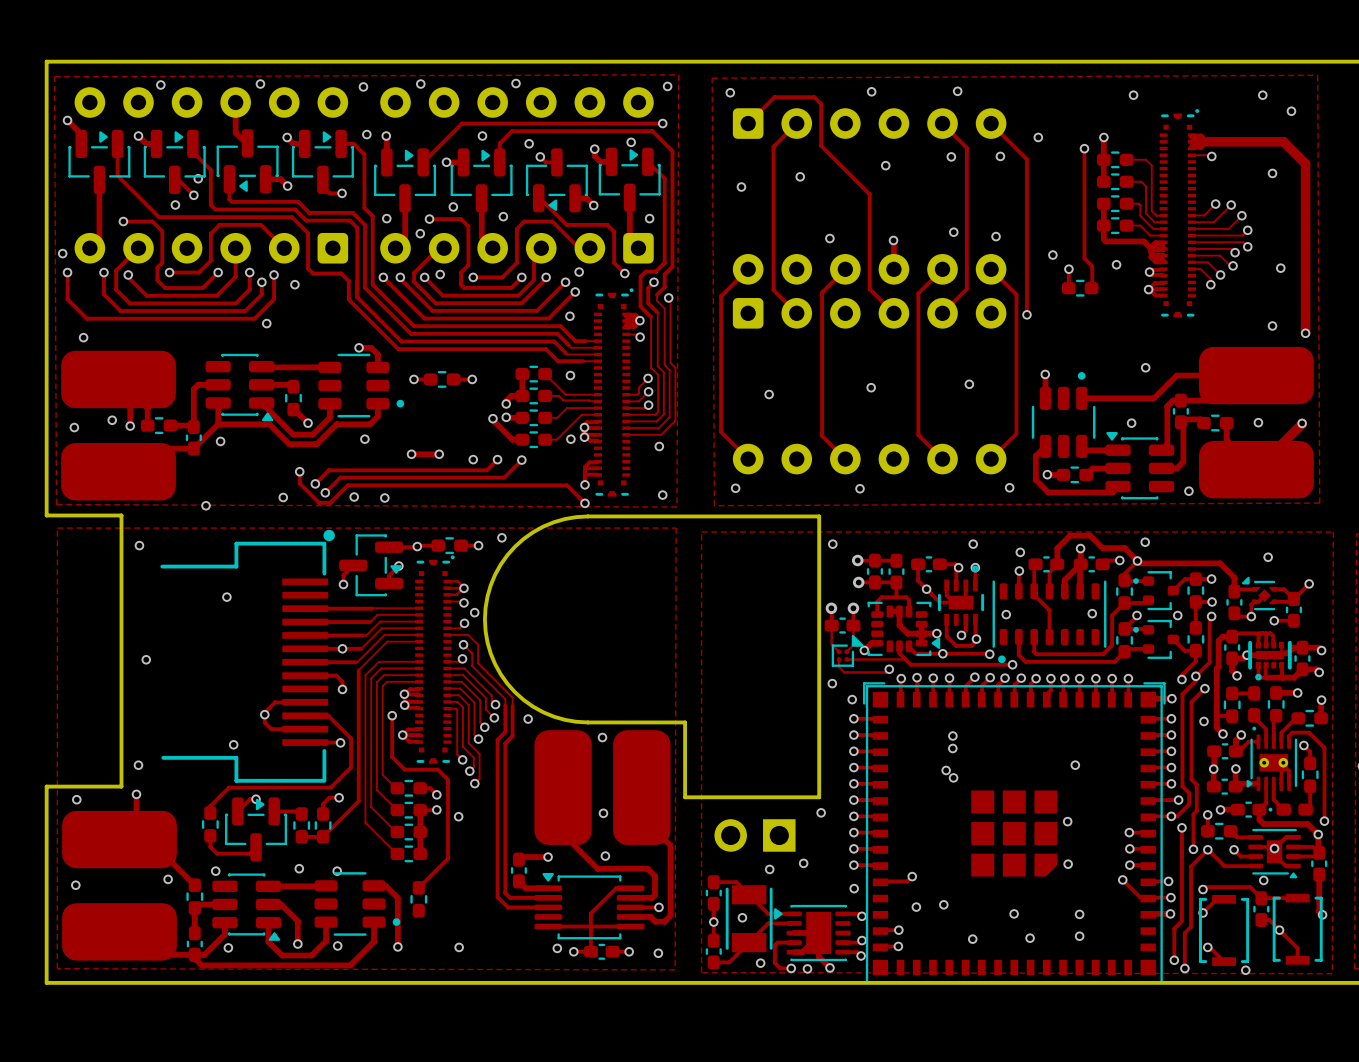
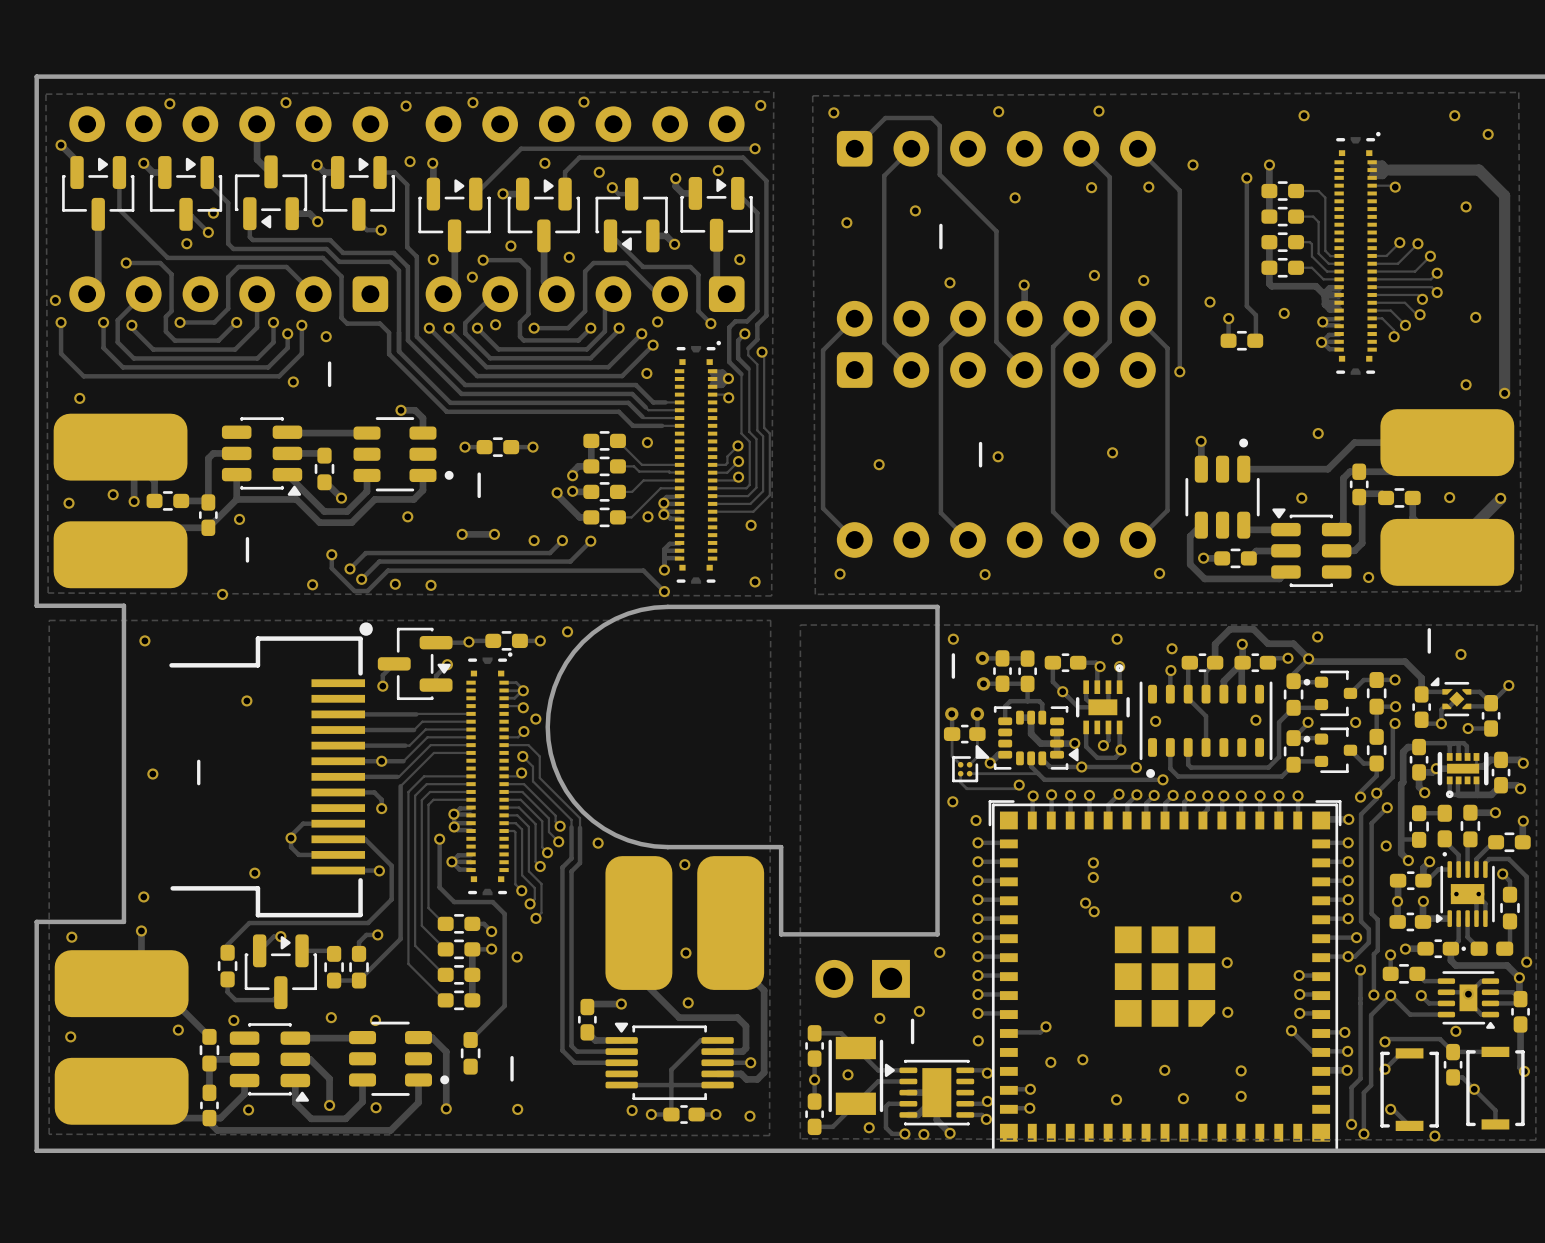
line: none -> (940, 225) (940, 247)
line: none -> (329, 363) (329, 385)
line: none -> (980, 443) (980, 465)
line: none -> (479, 474) (479, 496)
line: none -> (247, 538) (247, 561)
line: none -> (1429, 629) (1429, 652)
line: none -> (953, 654) (953, 677)
line: none -> (198, 761) (198, 783)
line: none -> (912, 1020) (912, 1042)
line: none -> (512, 1057) (512, 1079)

